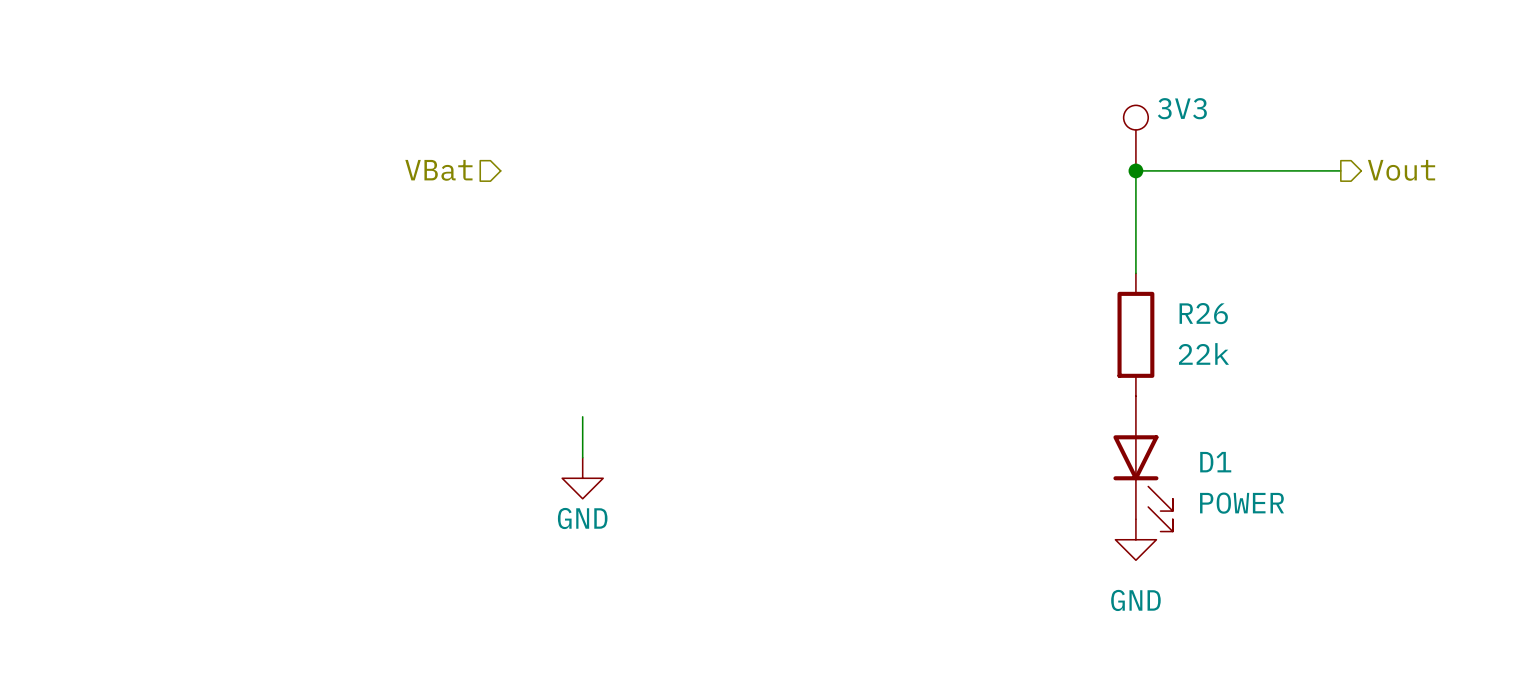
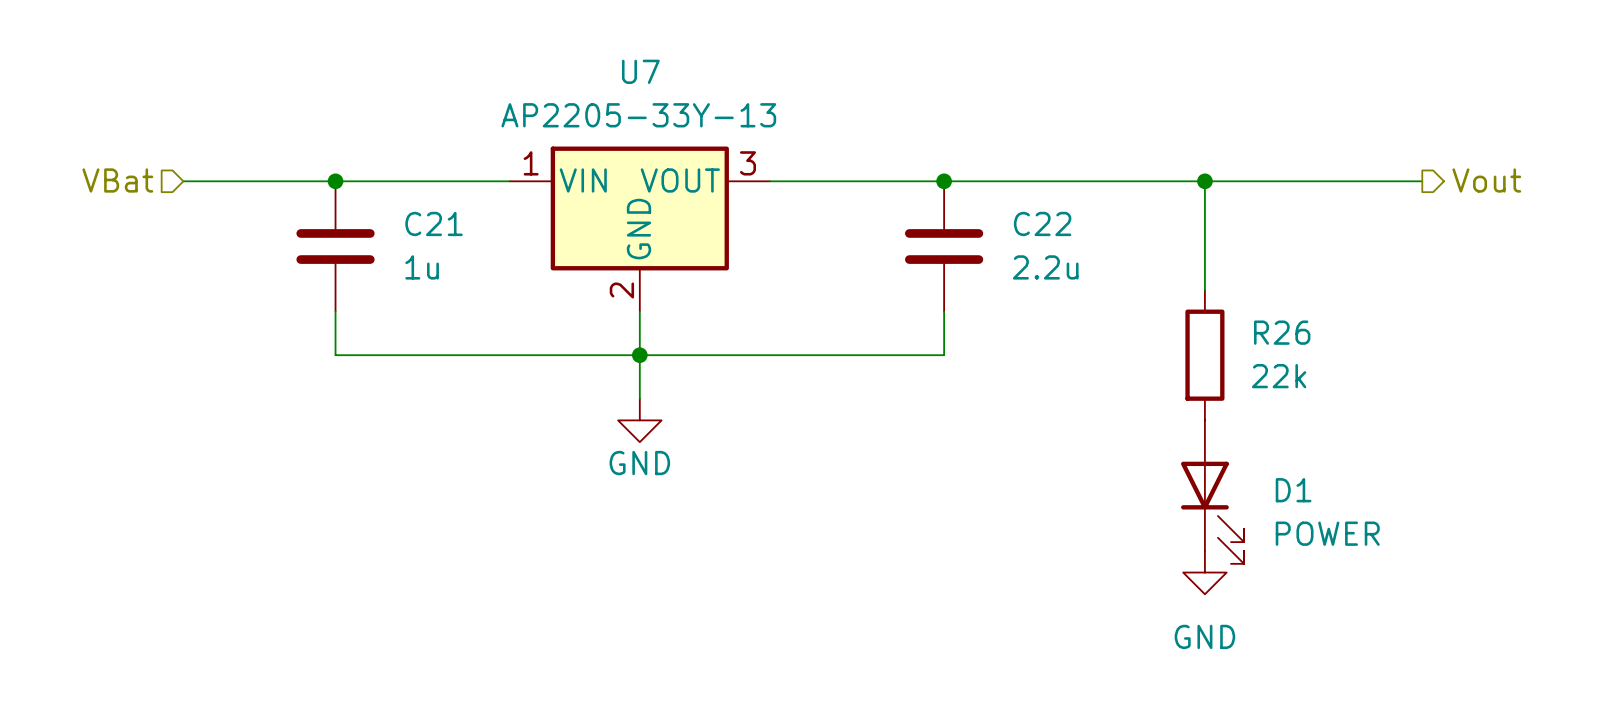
part: 3V3 (1135, 138) -> none
wire: none -> (183, 181) (509, 181)
junction: none -> (335, 181)
hierarchical label position: VBat (438, 170) -> VBat (117, 180)
wire: none -> (770, 181) (1204, 181)
junction: none -> (944, 181)
U7: none -> AP2205-33Y-13 (639, 229)
C21: none -> 1u (335, 246)
C22: none -> 2.2u (944, 246)
wire: none -> (335, 311) (335, 355) (944, 355) (944, 311)
wire: none -> (639, 311) (639, 398)
junction: none -> (639, 355)
wire: (582, 416) (582, 457) -> none
power symbol position: GND (582, 478) -> GND (639, 420)

